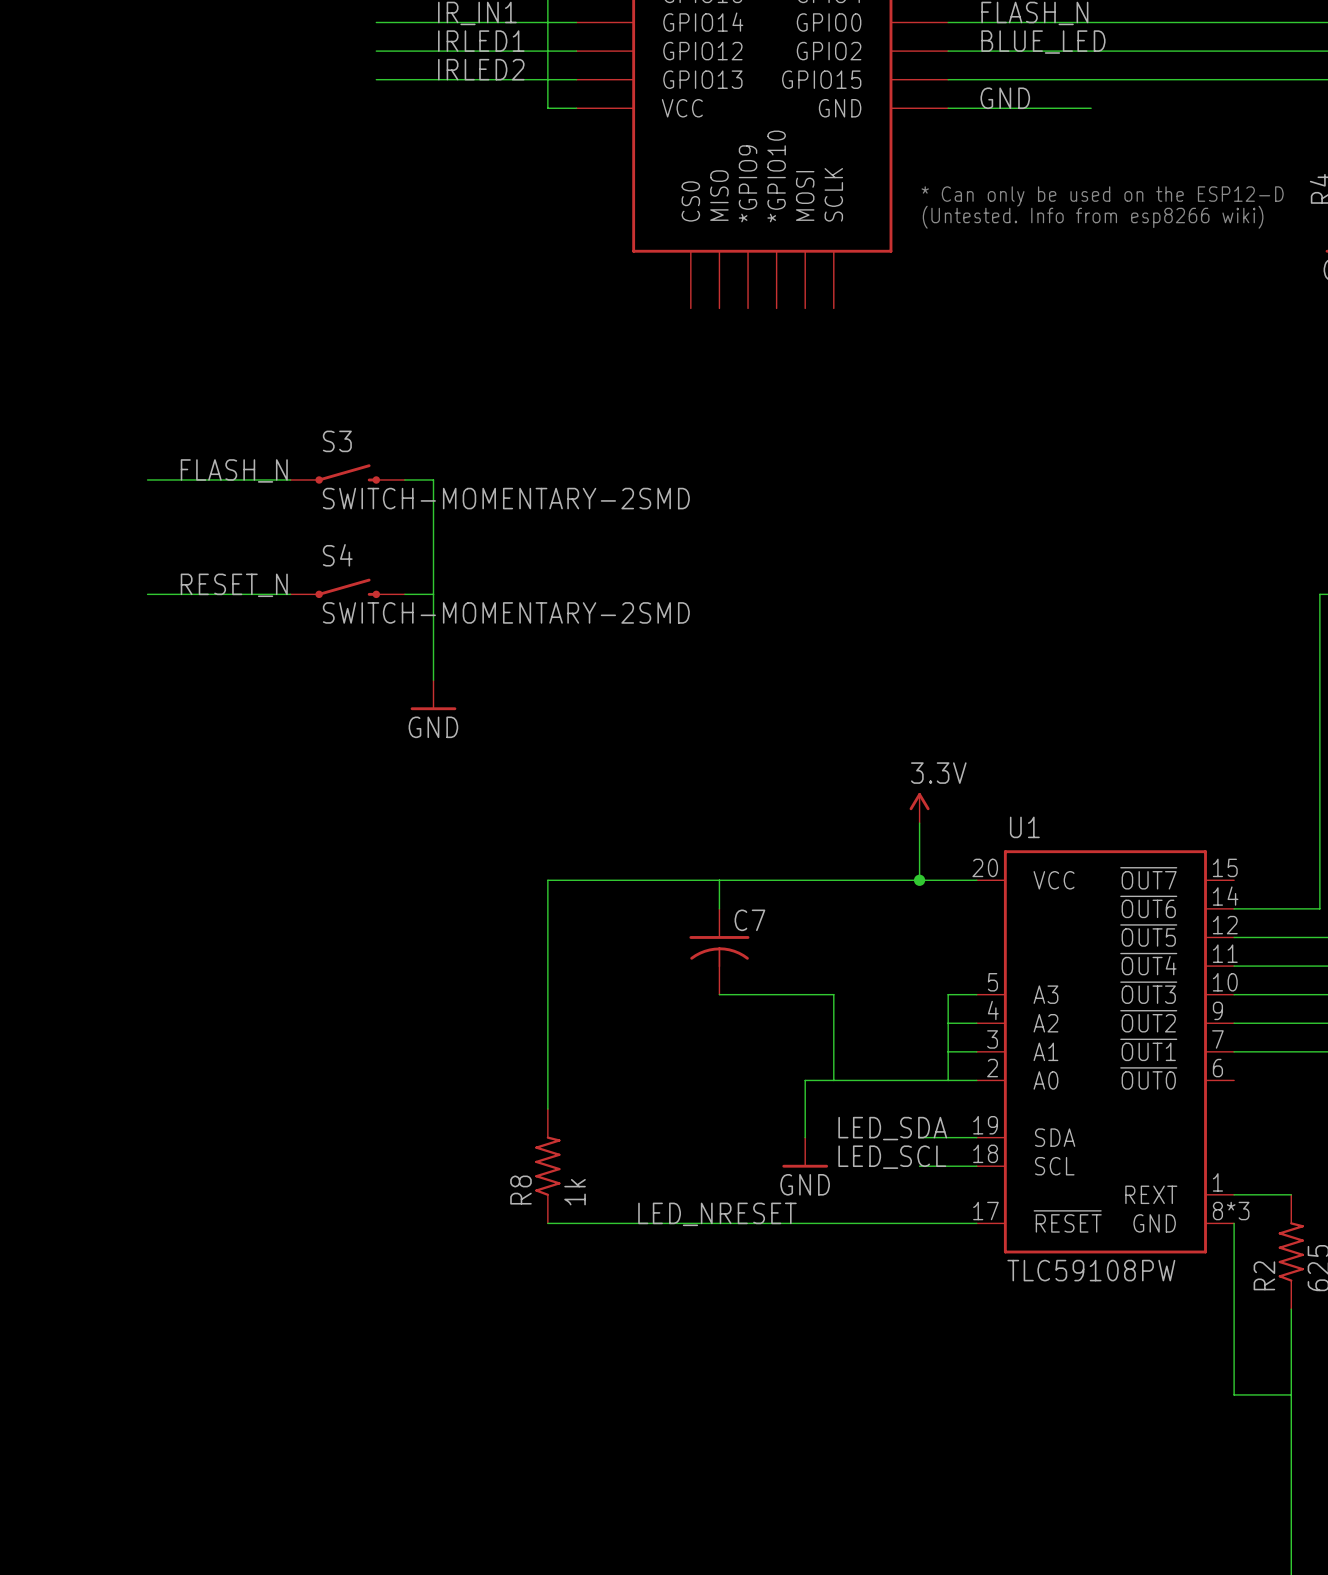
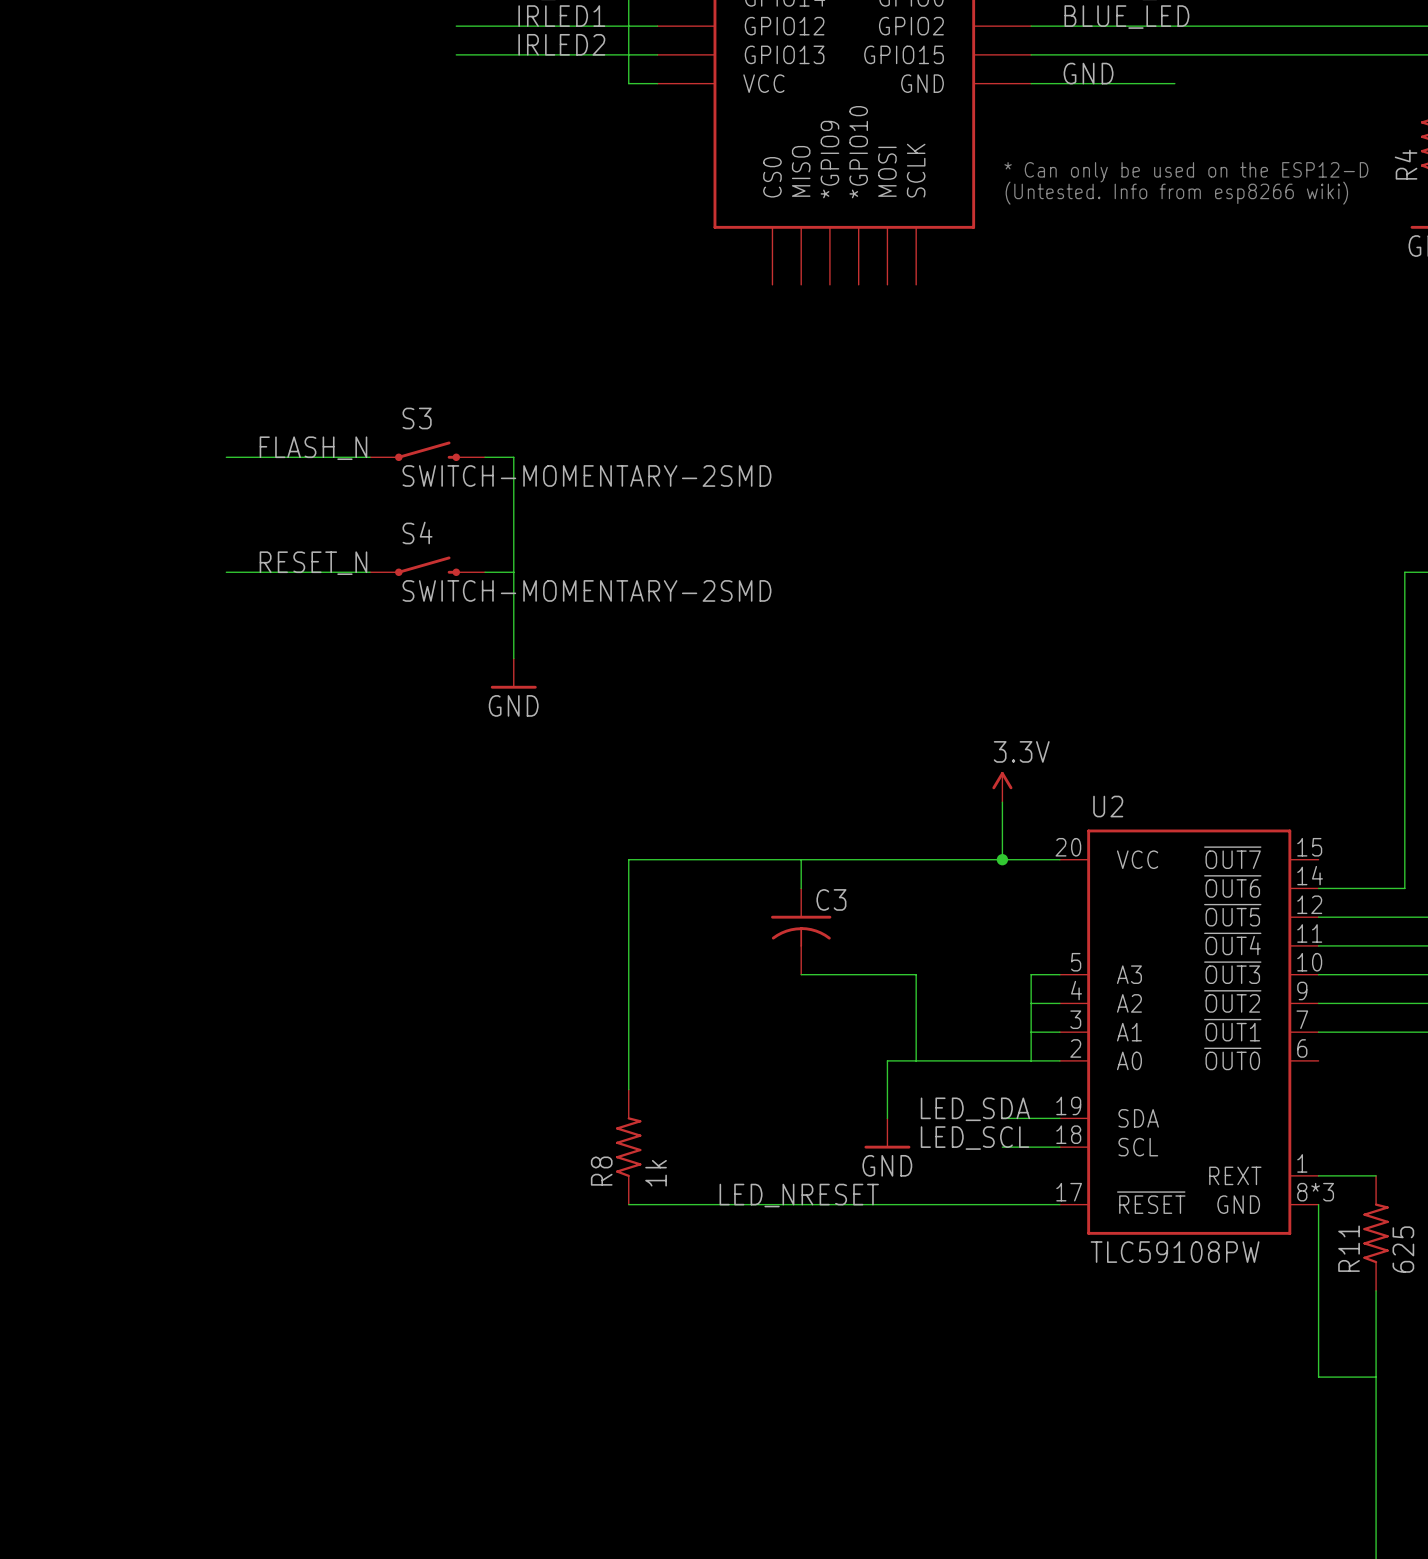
U1 name: U1 (1024, 827) -> U2 (1108, 806)
C7 name: C7 (749, 920) -> C3 (831, 899)
R2 name: R2 (1264, 1275) -> R11 (1349, 1248)

